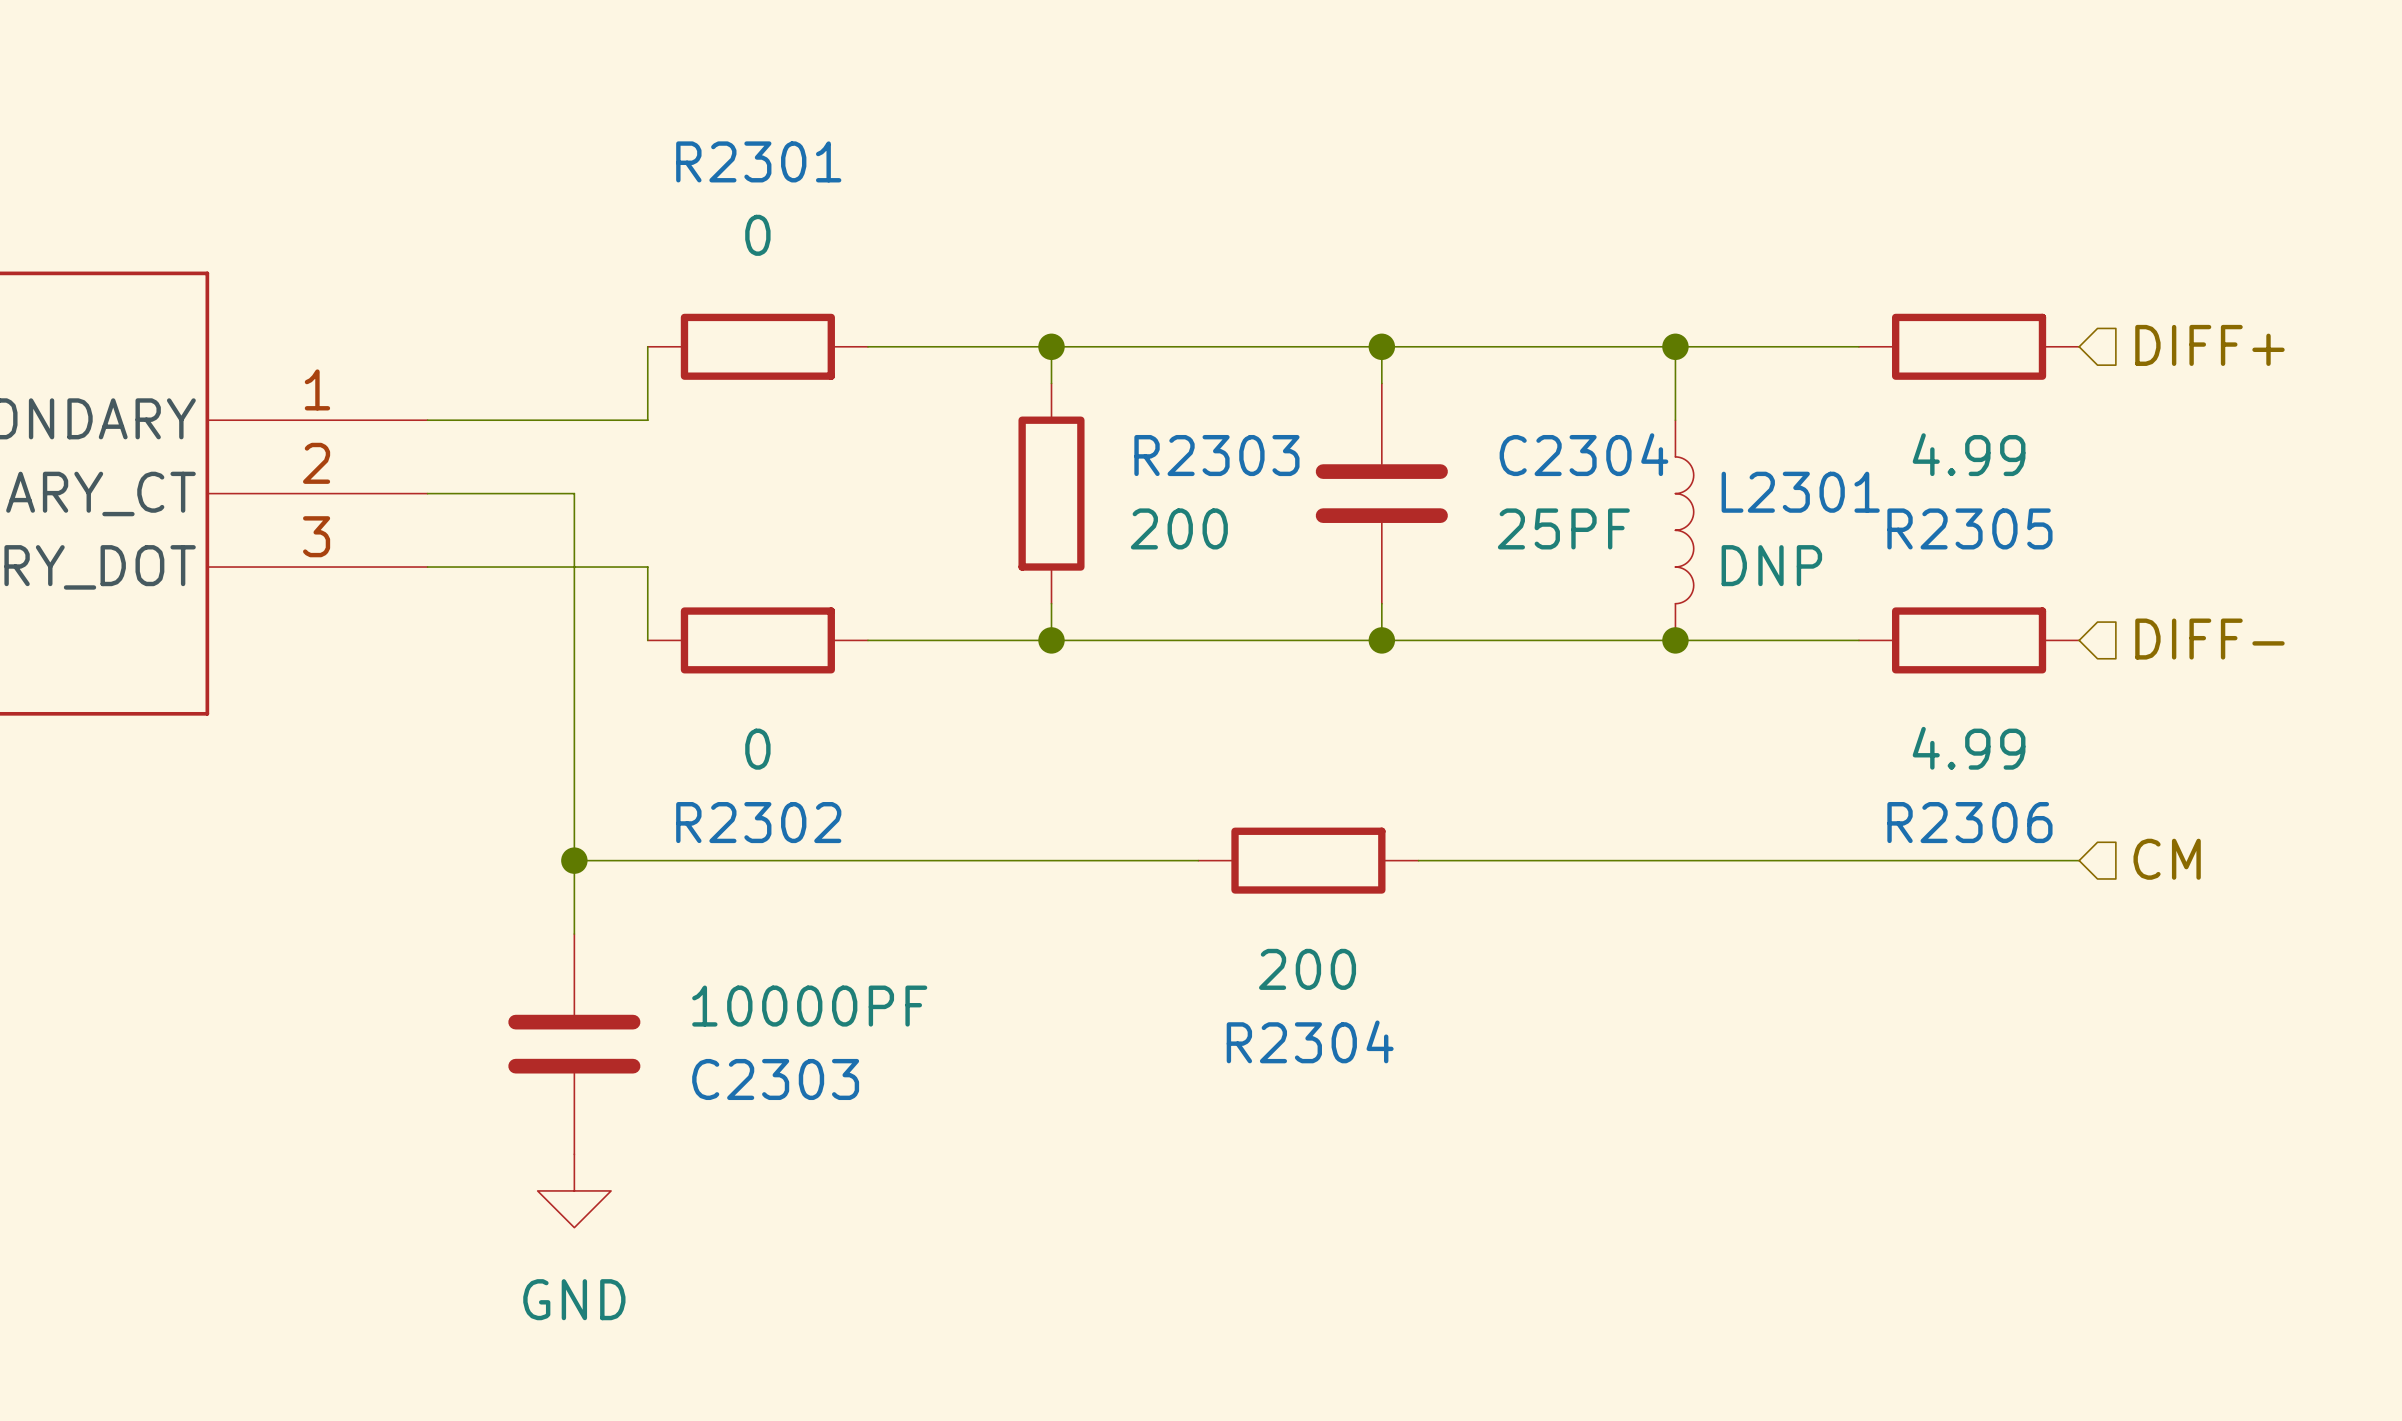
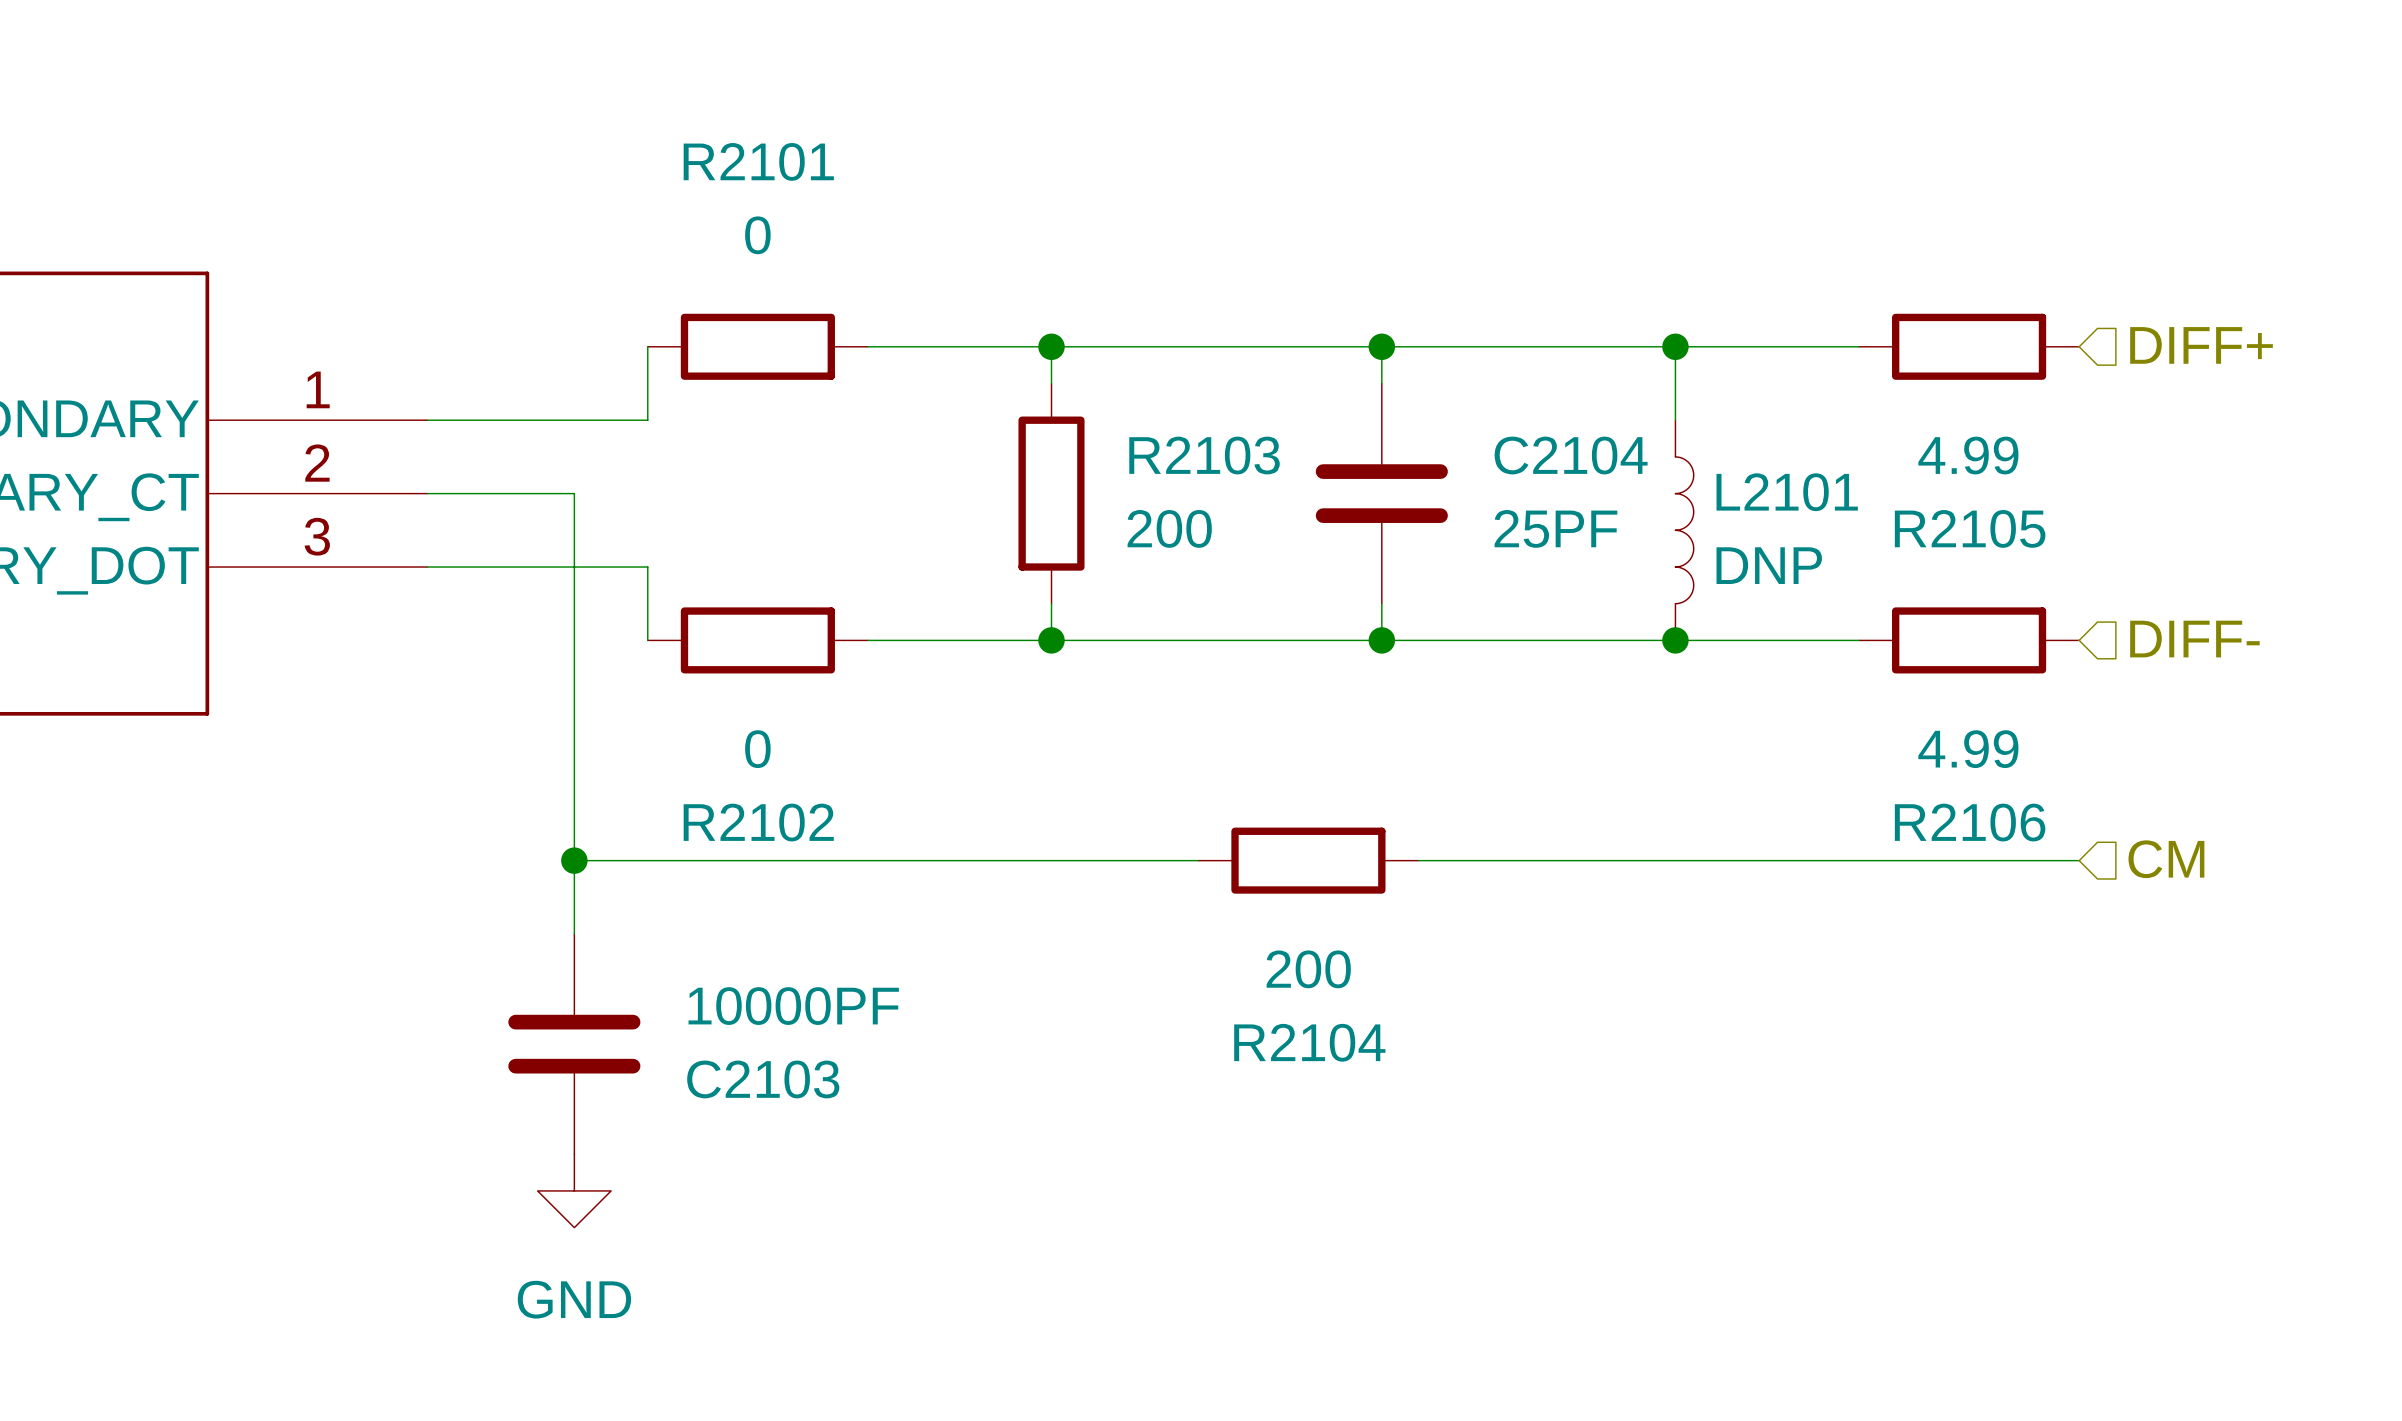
R2301 name: R2301 (758, 161) -> R2101 (758, 161)
C2304 name: C2304 (1583, 454) -> C2104 (1571, 455)
R2303 name: R2303 (1216, 455) -> R2103 (1204, 455)
L2301 name: L2301 (1800, 492) -> L2101 (1787, 492)
R2305 name: R2305 (1969, 528) -> R2105 (1970, 528)
R2302 name: R2302 (758, 822) -> R2102 (758, 822)
R2306 name: R2306 (1969, 822) -> R2106 (1970, 822)
R2304 name: R2304 (1310, 1041) -> R2104 (1309, 1042)
C2303 name: C2303 (775, 1079) -> C2103 (763, 1079)

